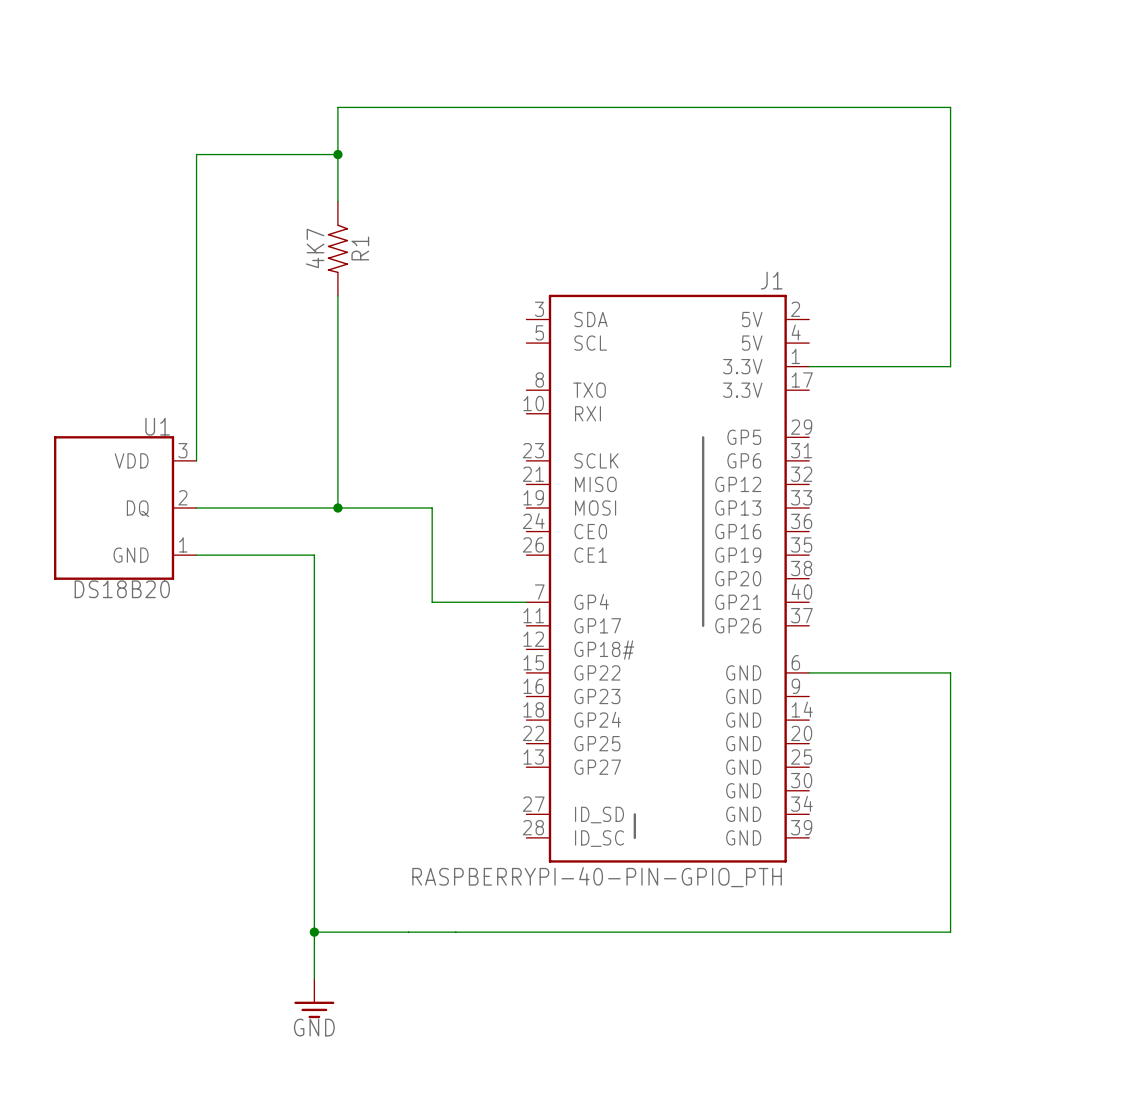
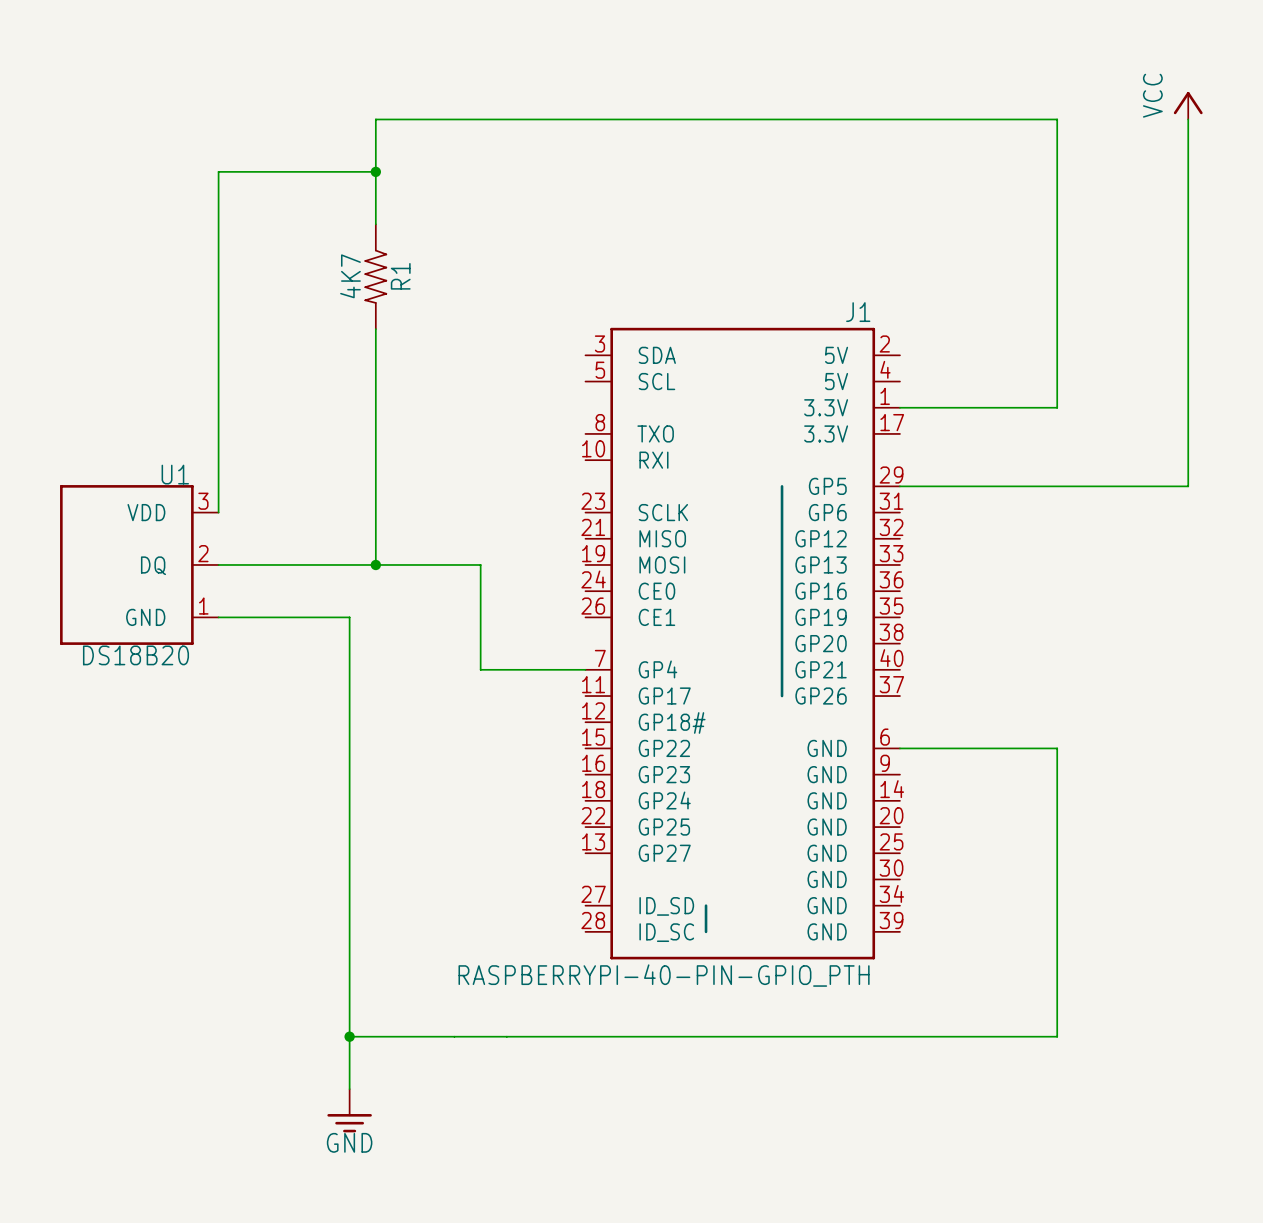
power symbol: none -> VCC (1188, 105)
wire: none -> (1188, 119) (1188, 486) (899, 486)

